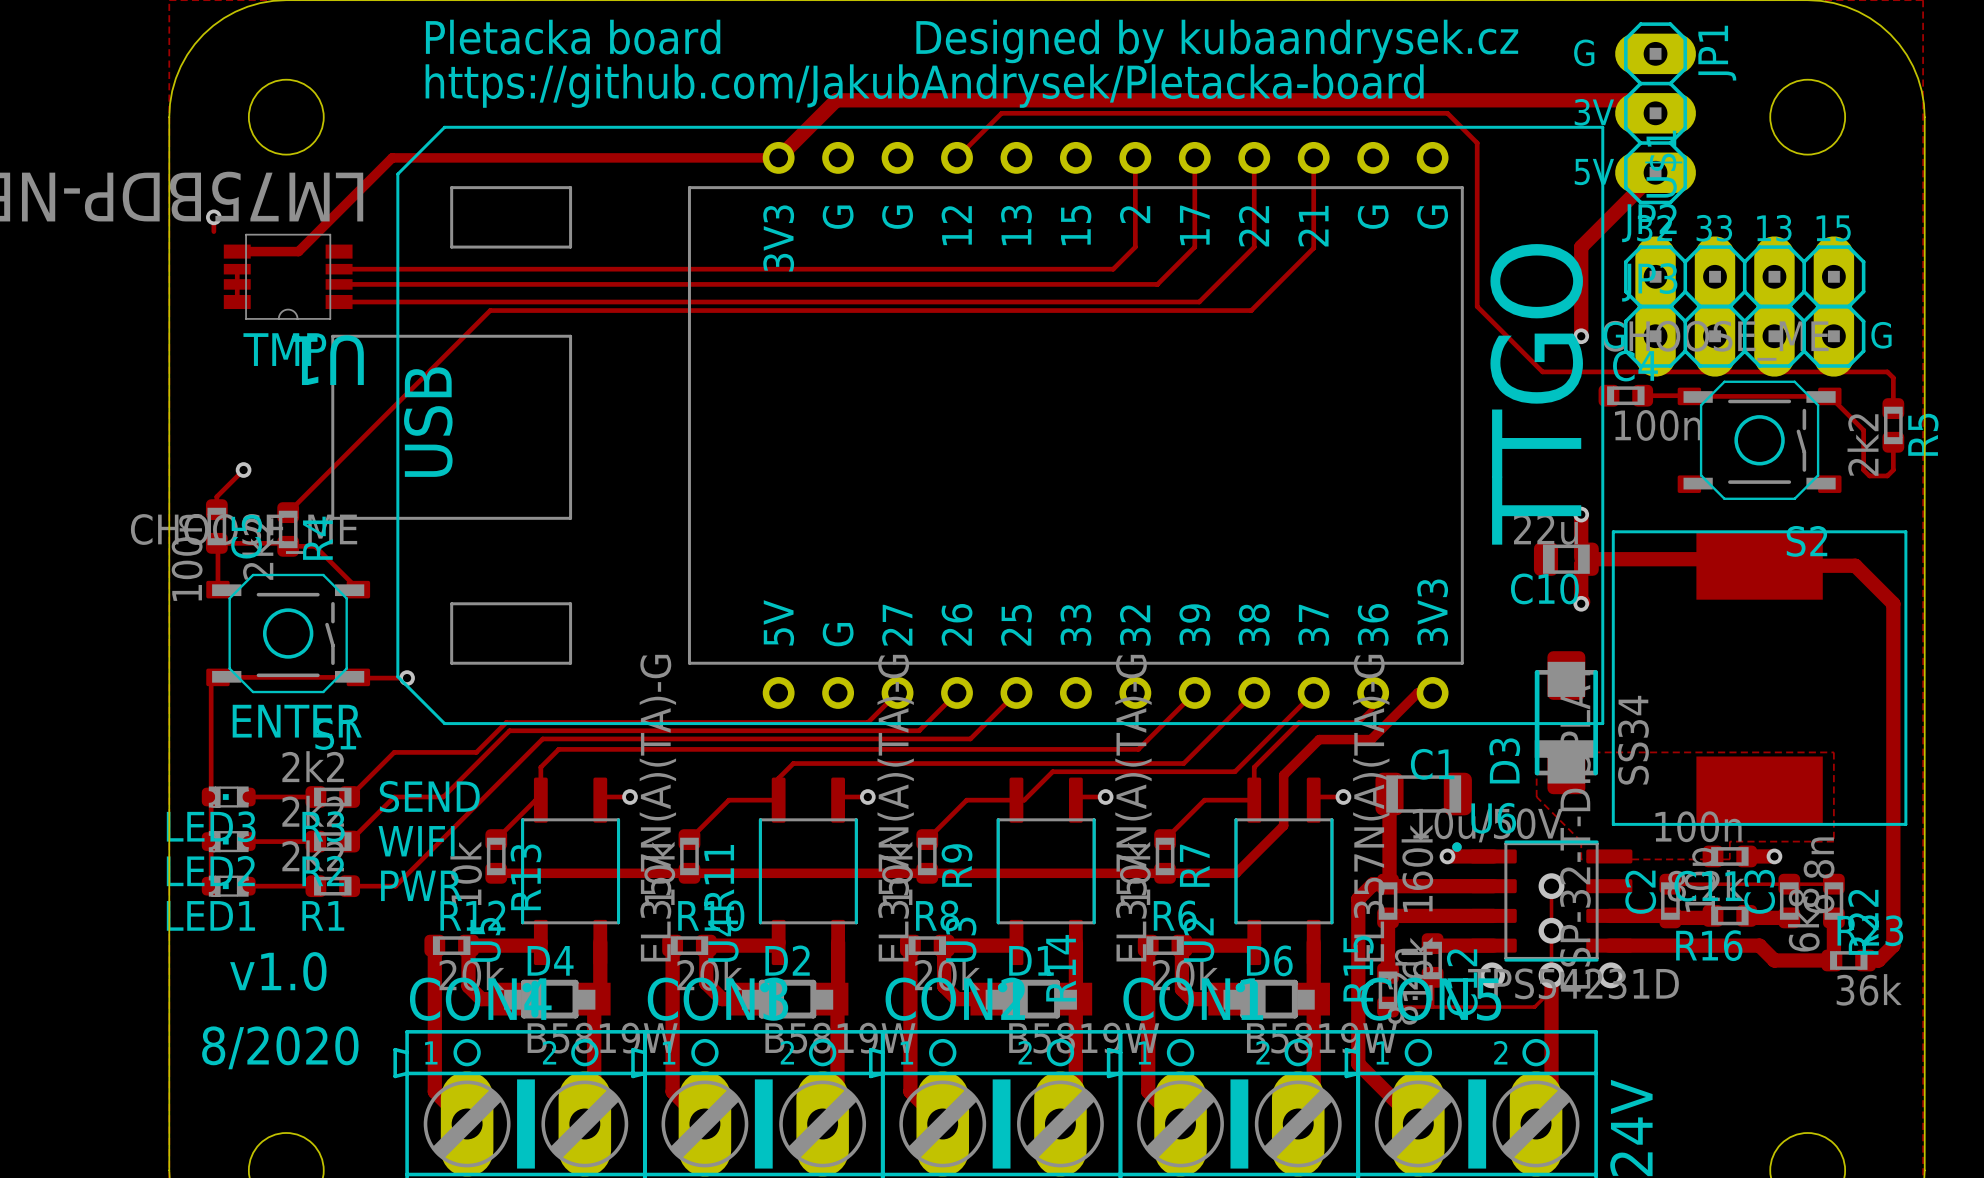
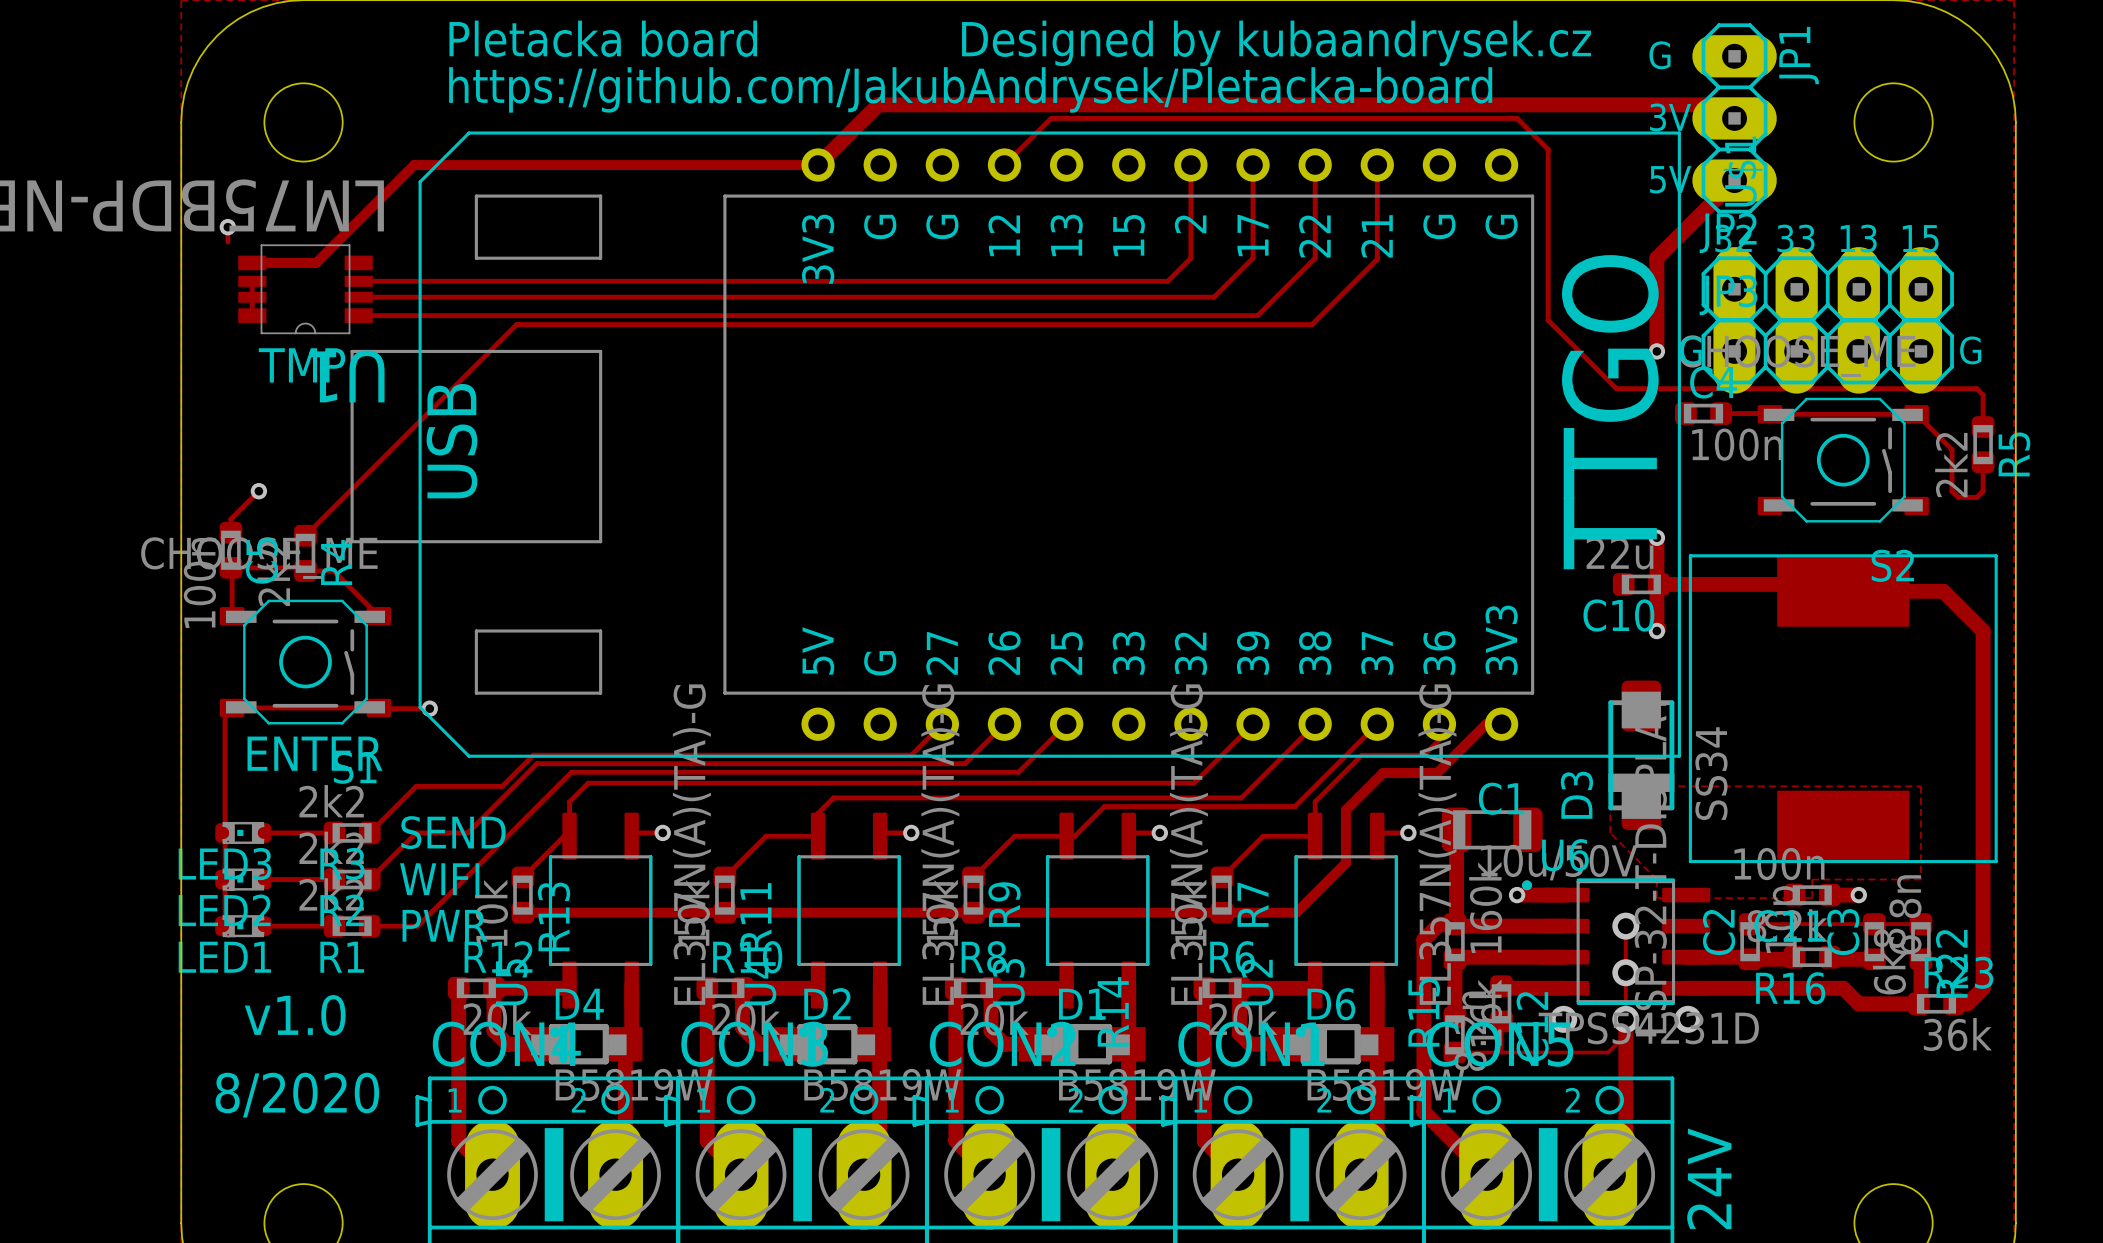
C10 footprint: [1533, 542, 1599, 576] -> [1612, 573, 1670, 596]

